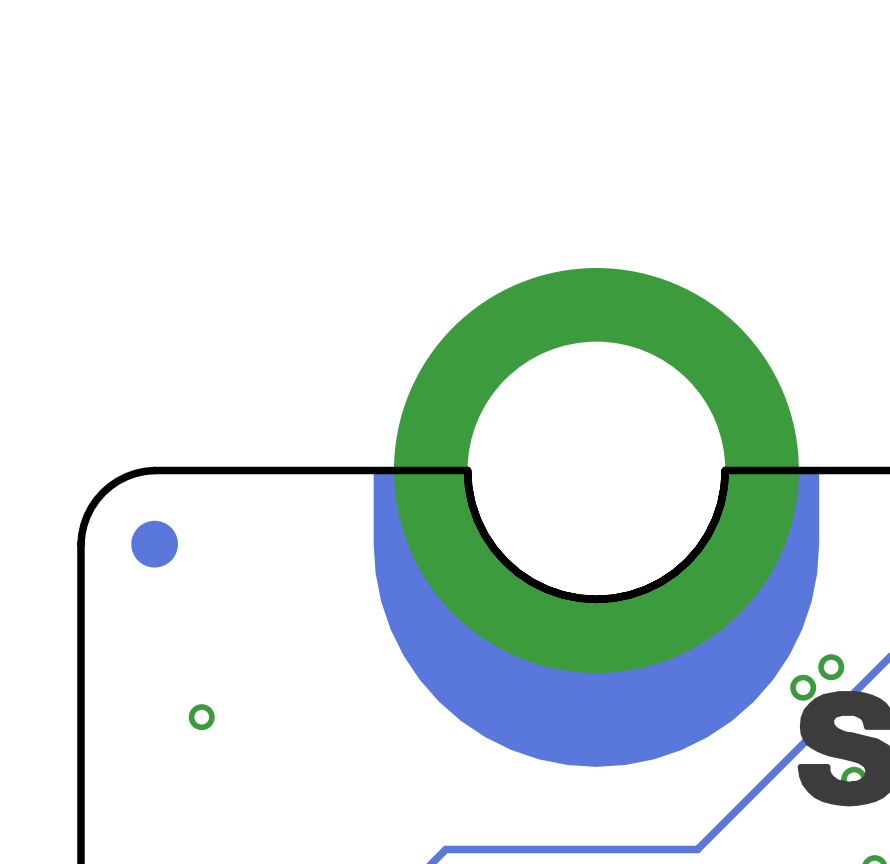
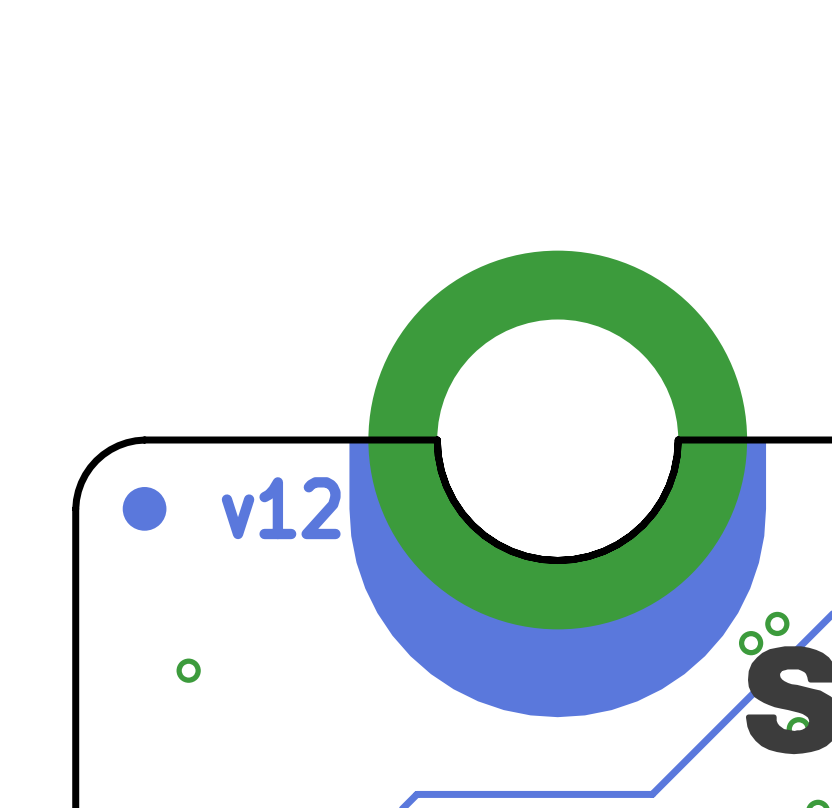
text: none -> v12 (281, 508)

